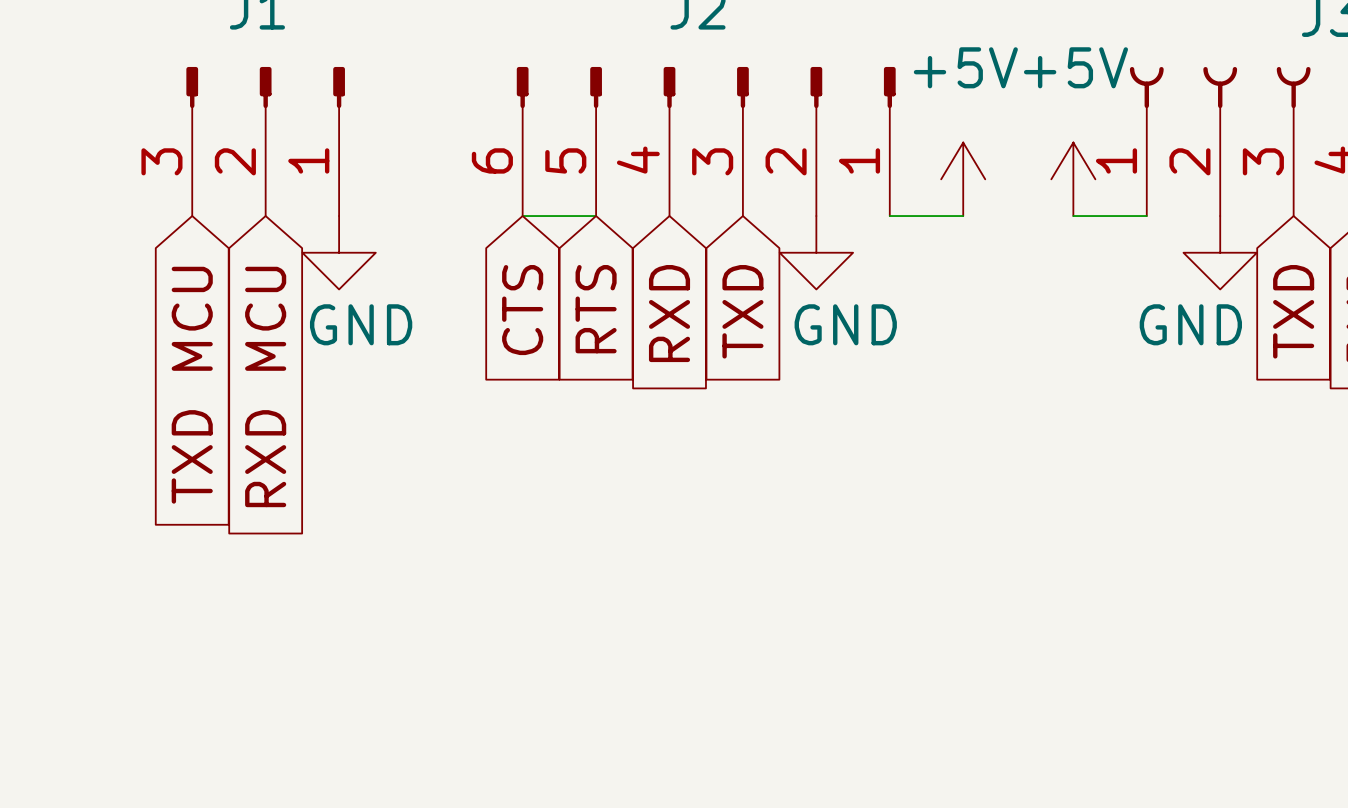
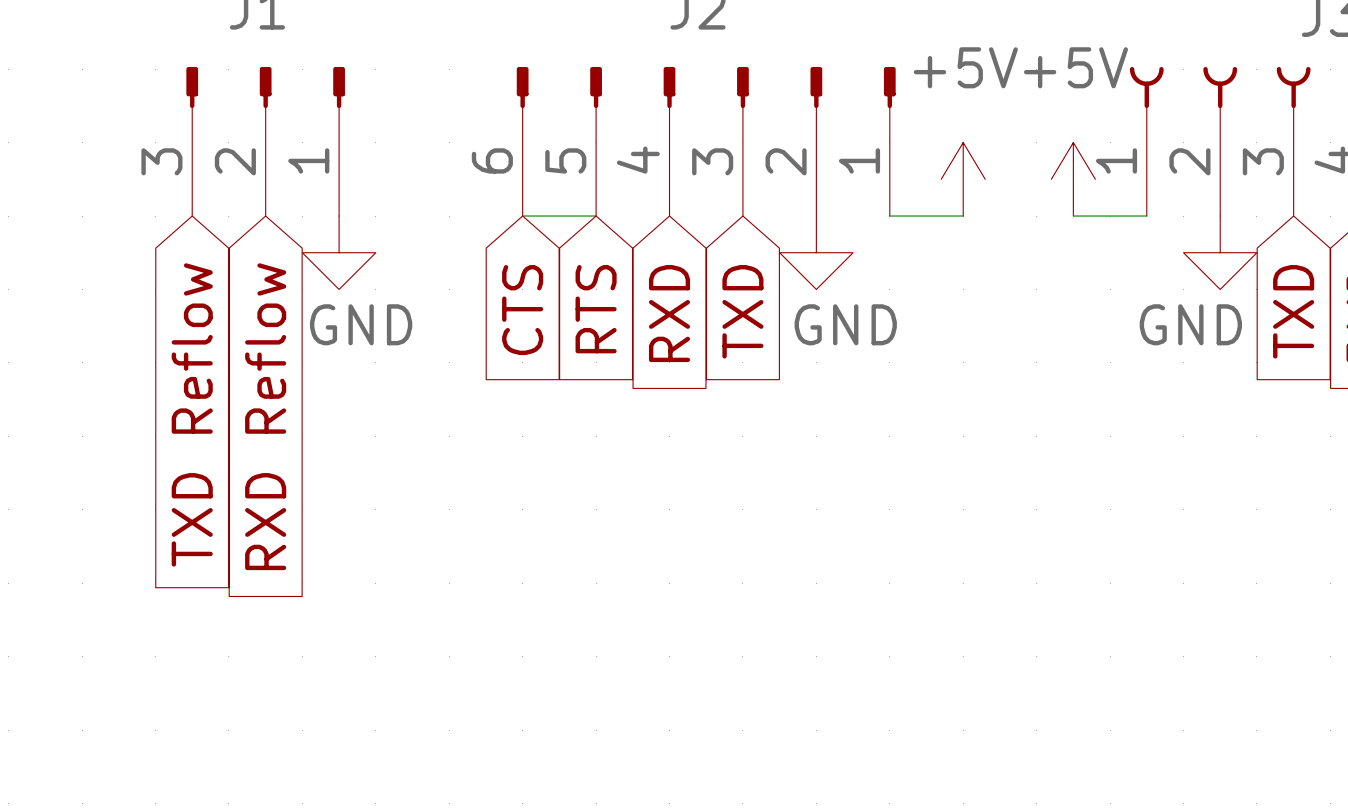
global label: TXD MCU (192, 385) -> TXD Reflow (192, 414)
global label: RXD MCU (265, 386) -> RXD Reflow (265, 416)

